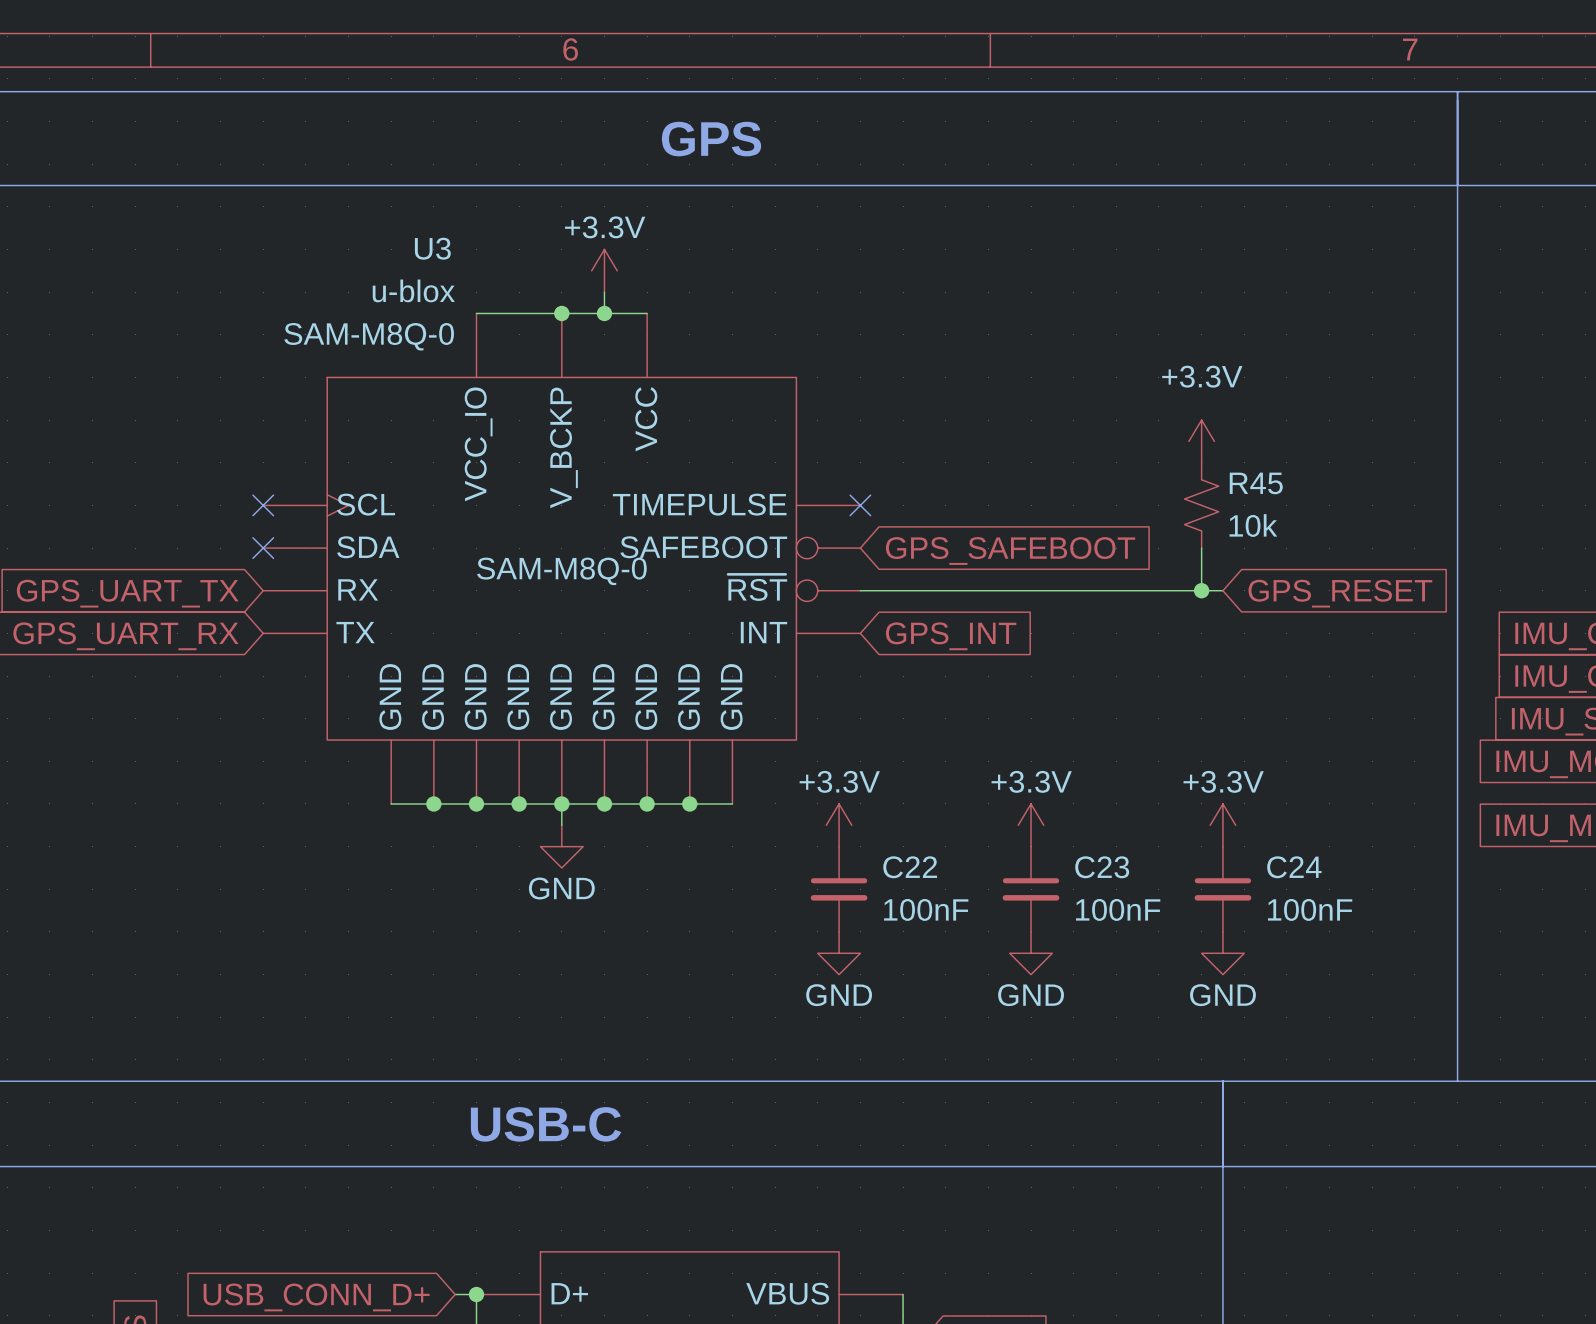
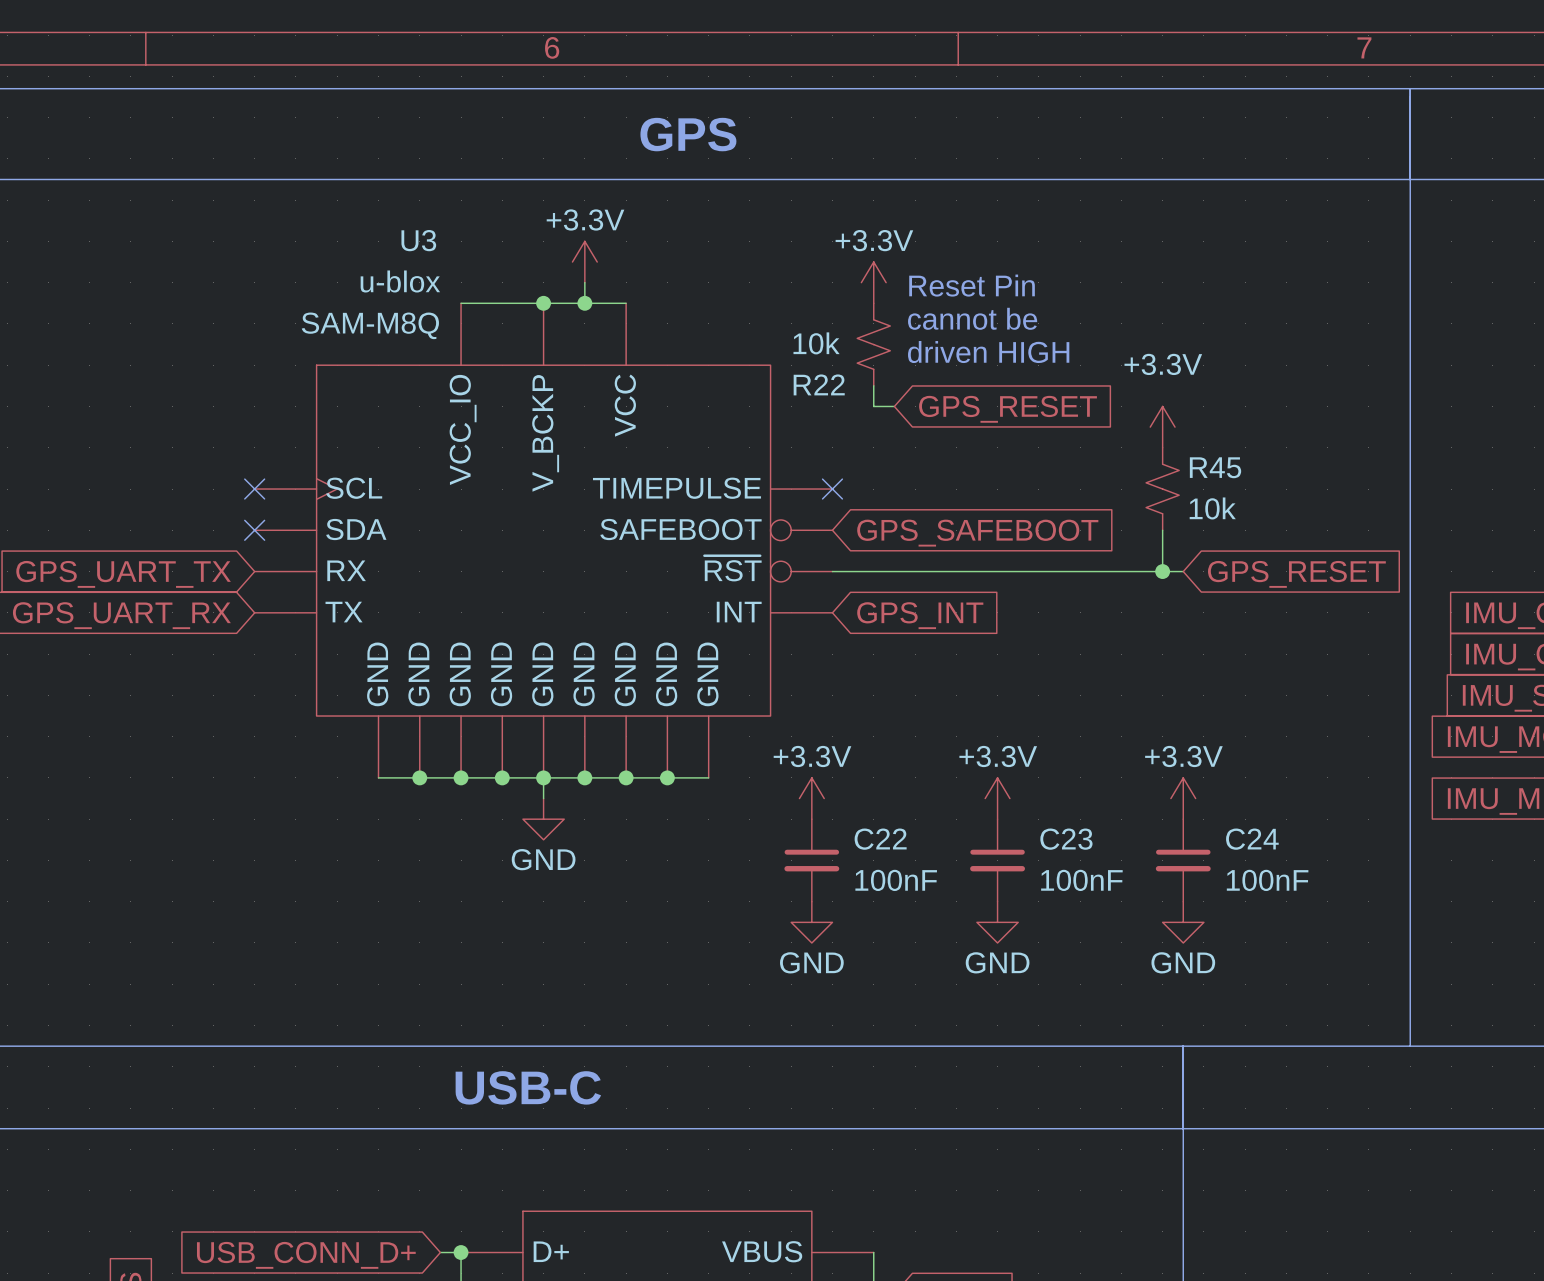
power symbol: none -> +3.3V (873, 282)
text: none -> Reset Pin (972, 285)
text: none -> cannot be (972, 318)
U3 text: SAM-M8Q-0 (369, 336) -> SAM-M8Q (370, 325)
R22: none -> 10k (873, 344)
text: none -> driven HIGH (988, 352)
wire: none -> (873, 385) (873, 406) (894, 406)
global label: none -> GPS_RESET (1008, 409)
U3 value: SAM-M8Q-0 (561, 571) -> none

